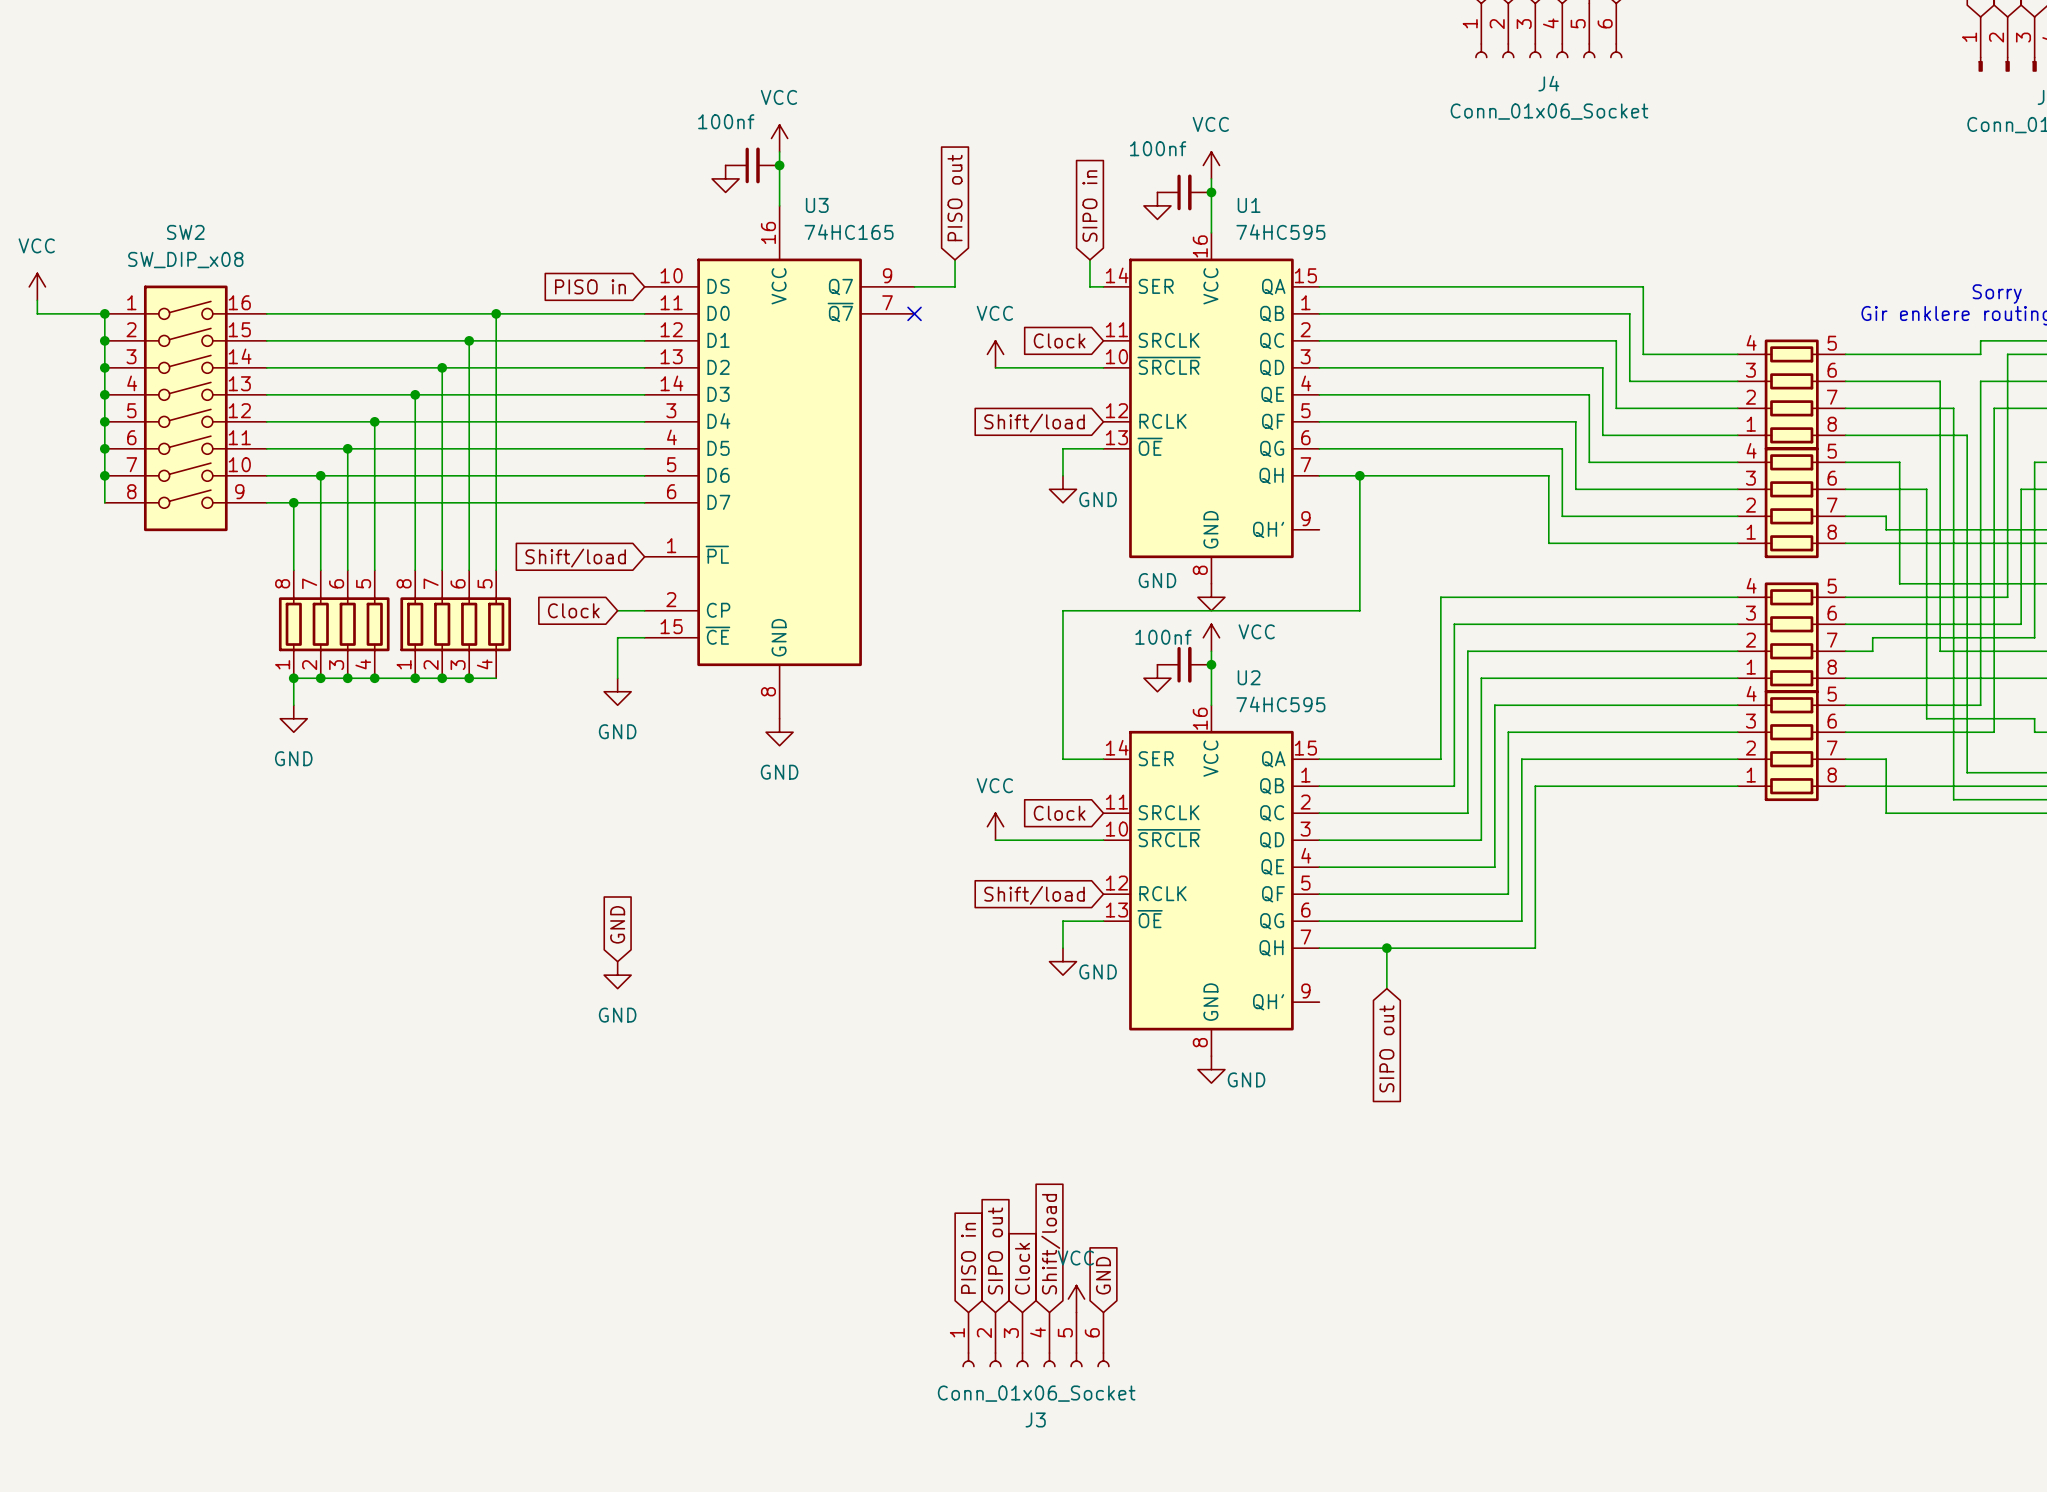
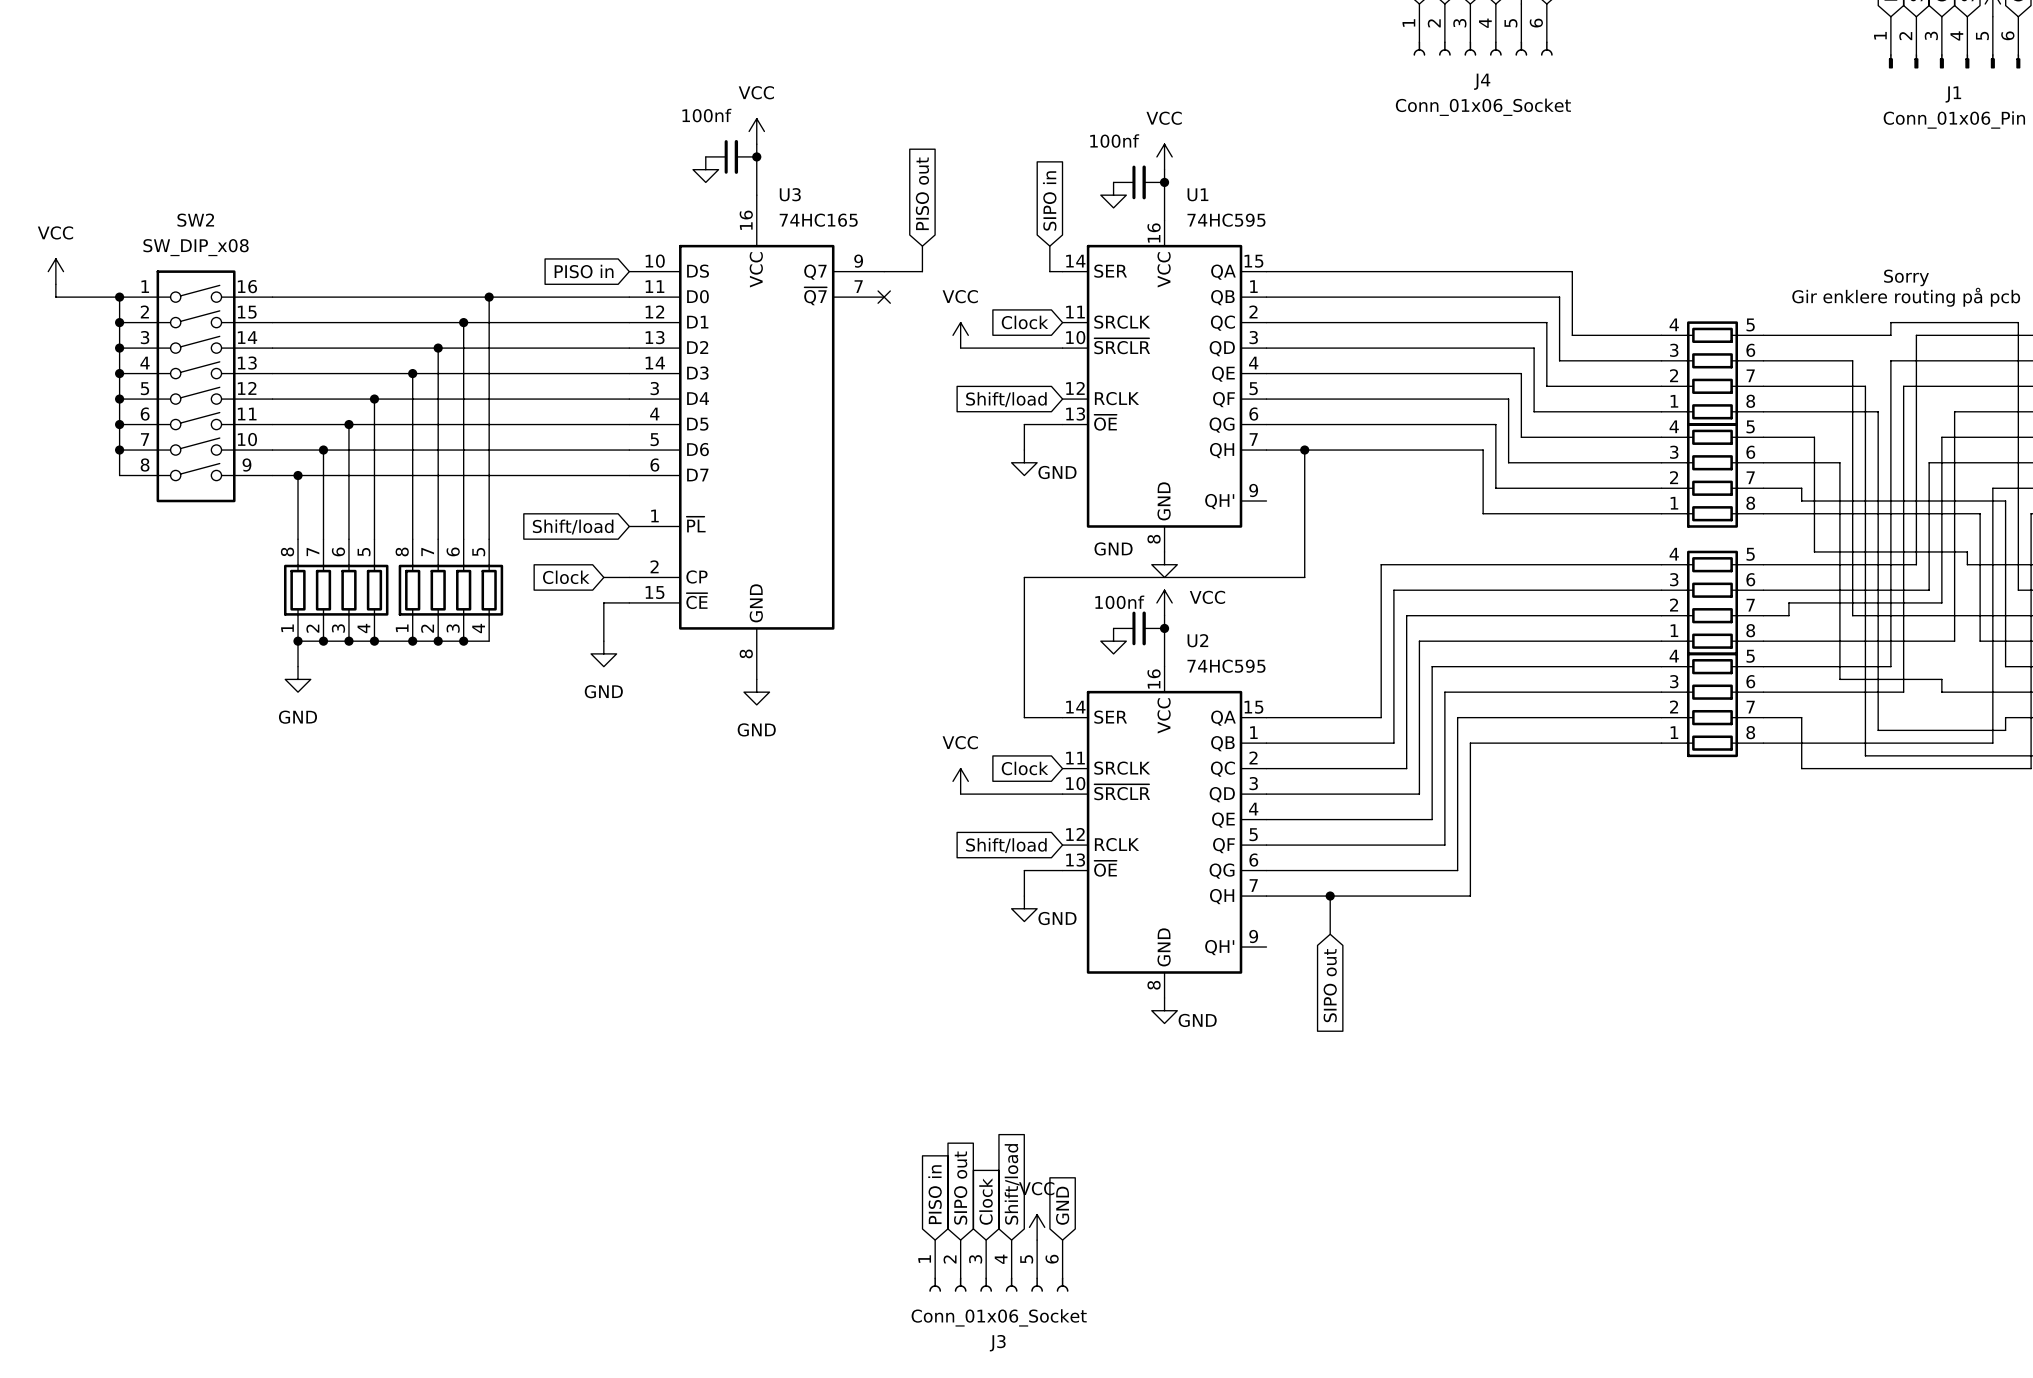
global label: GND (617, 924) -> none
power symbol: GND (617, 975) -> none

